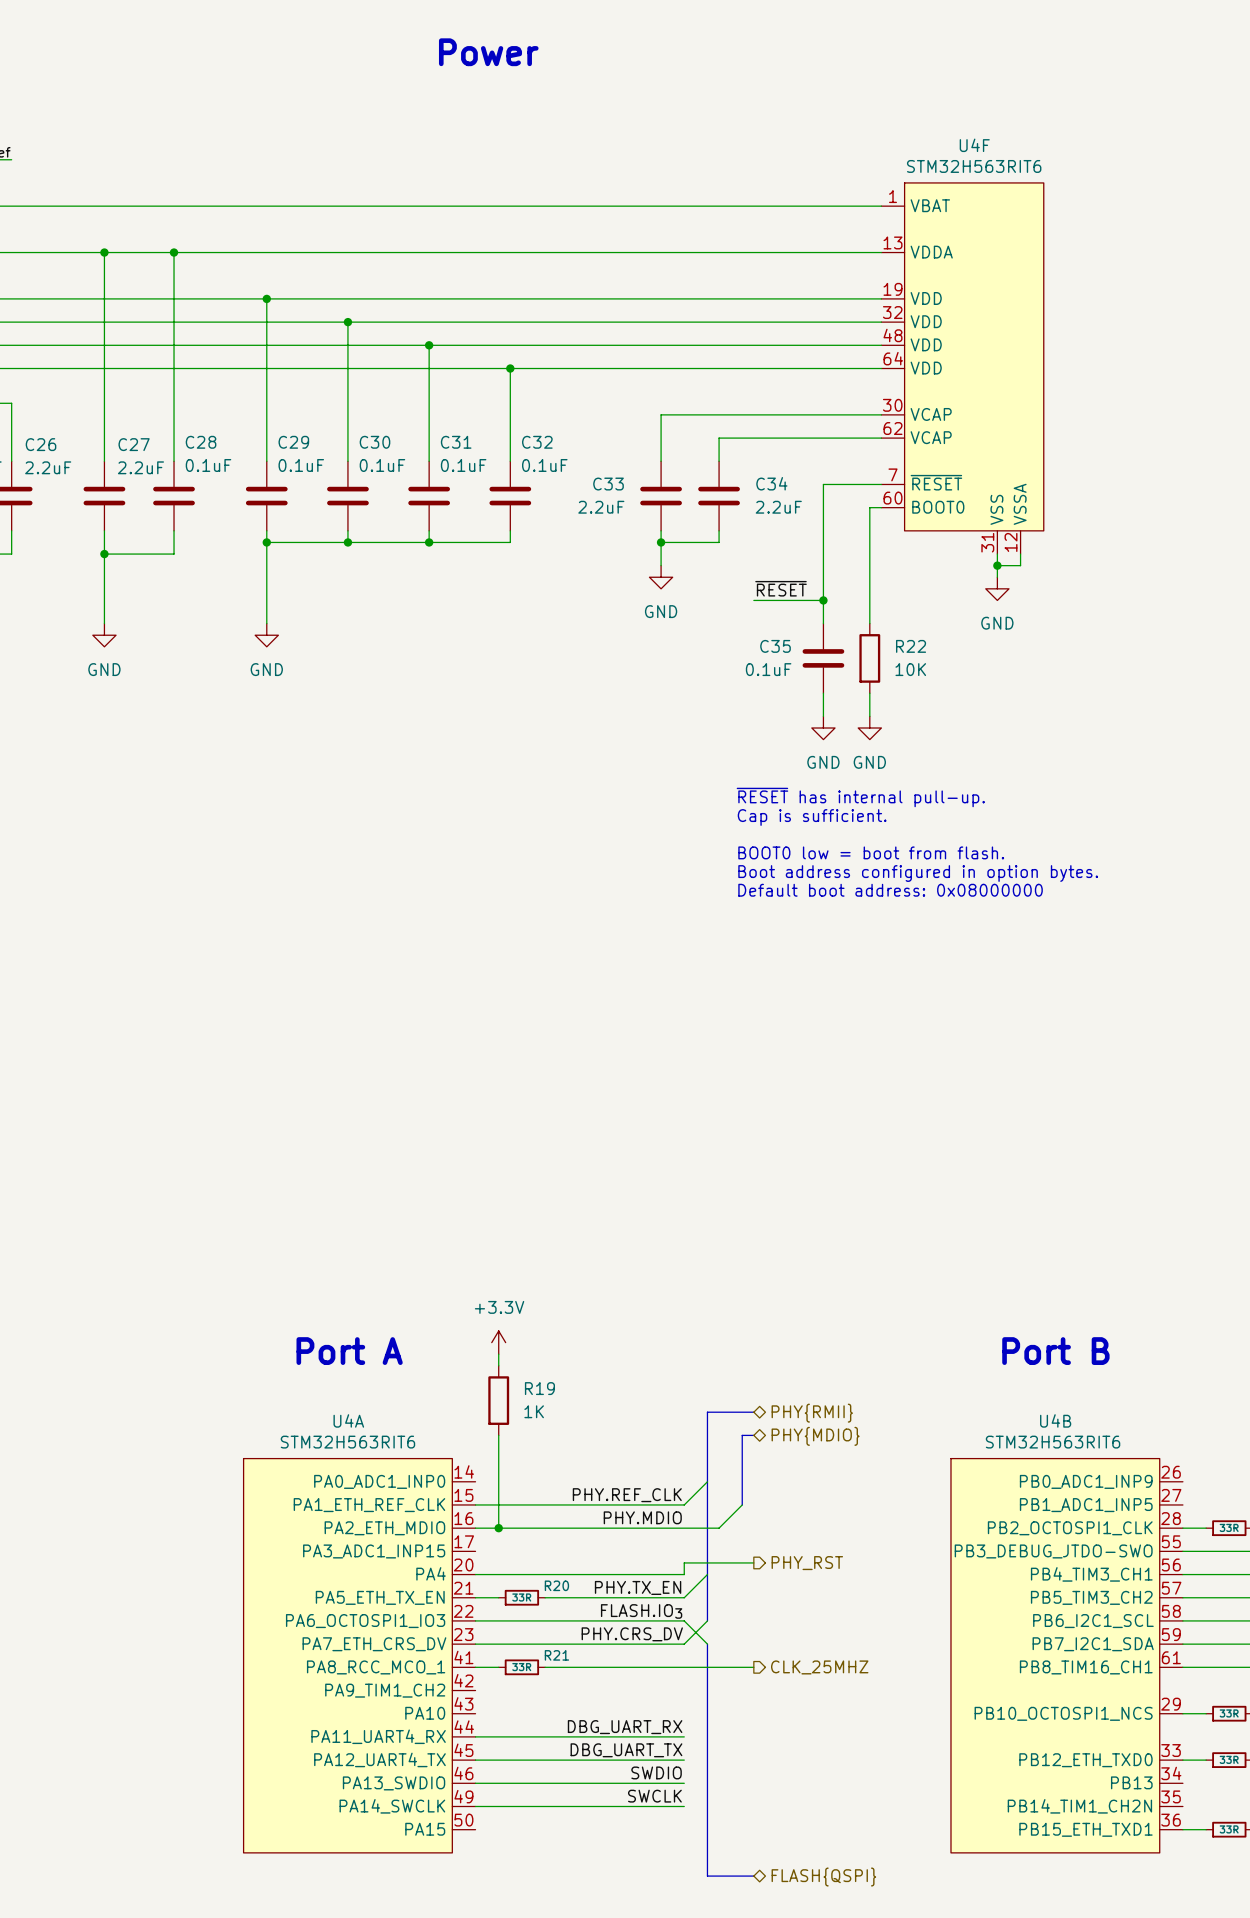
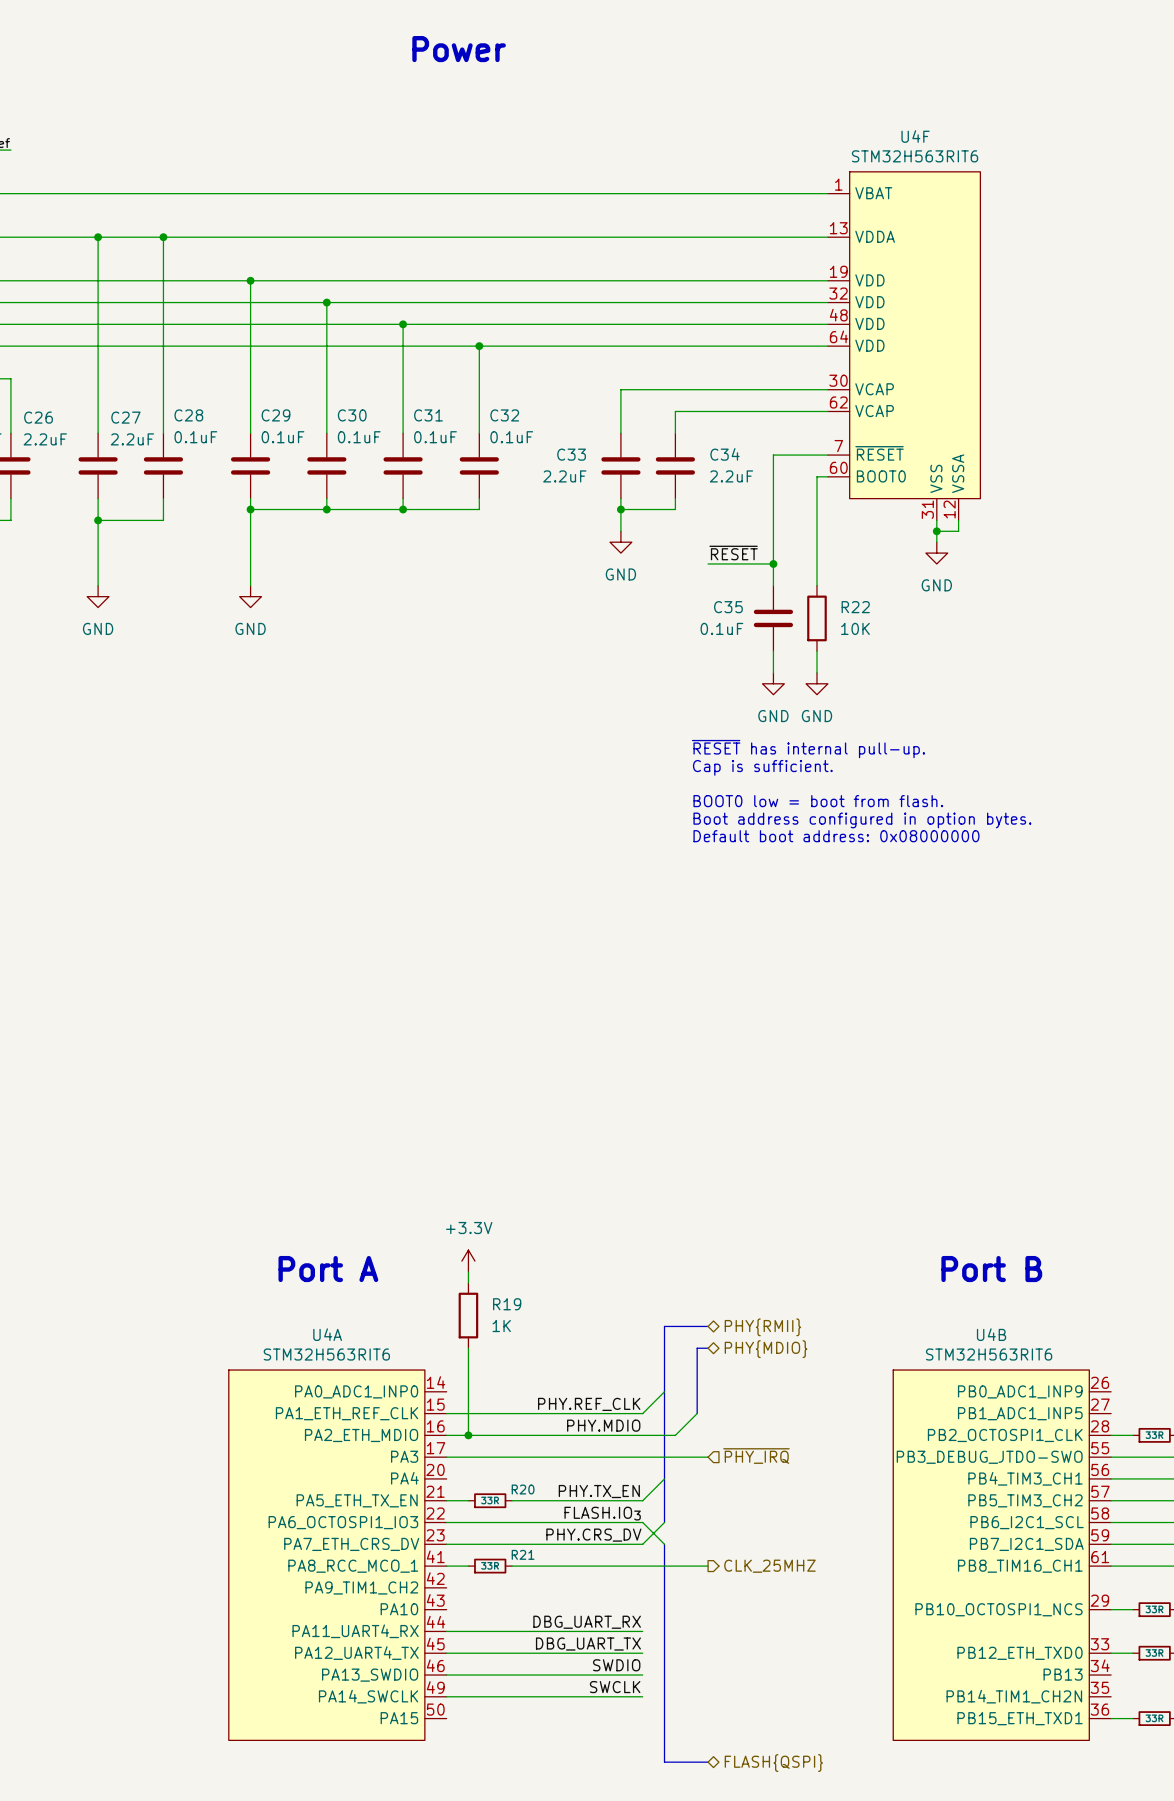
hierarchical label: none -> ~{PHY_IRQ} (756, 1456)
U4A pin name: PA3_ADC1_INP15 (374, 1551) -> PA3 (404, 1456)
wire: none -> (446, 1457) (708, 1457)
wire: (753, 1562) (684, 1562) (684, 1574) (475, 1574) -> none
hierarchical label: PHY_RST (807, 1563) -> none

